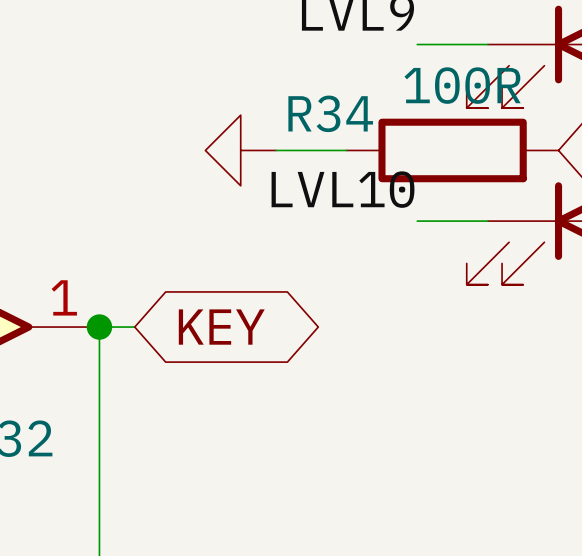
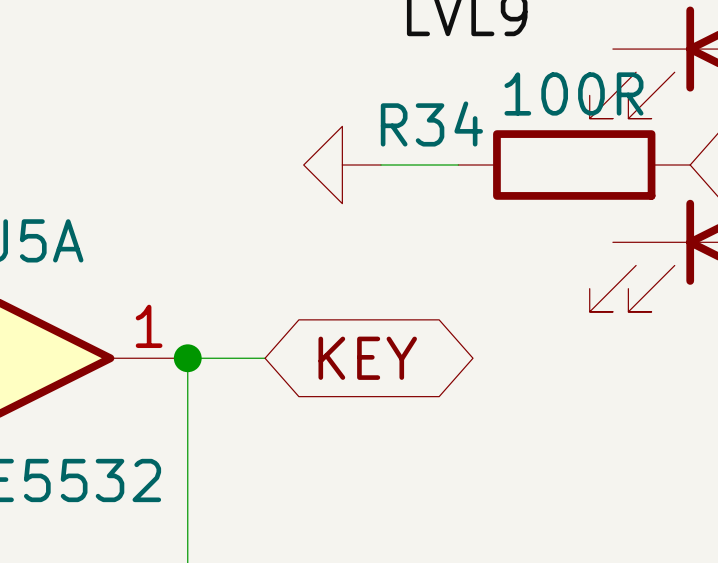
wire: (417, 44) (487, 44) -> none
label: LVL10 (343, 189) -> none
wire: (417, 221) (487, 221) -> none
wire: none -> (226, 358) (265, 358)
global label position: KEY (221, 327) -> KEY (367, 358)

